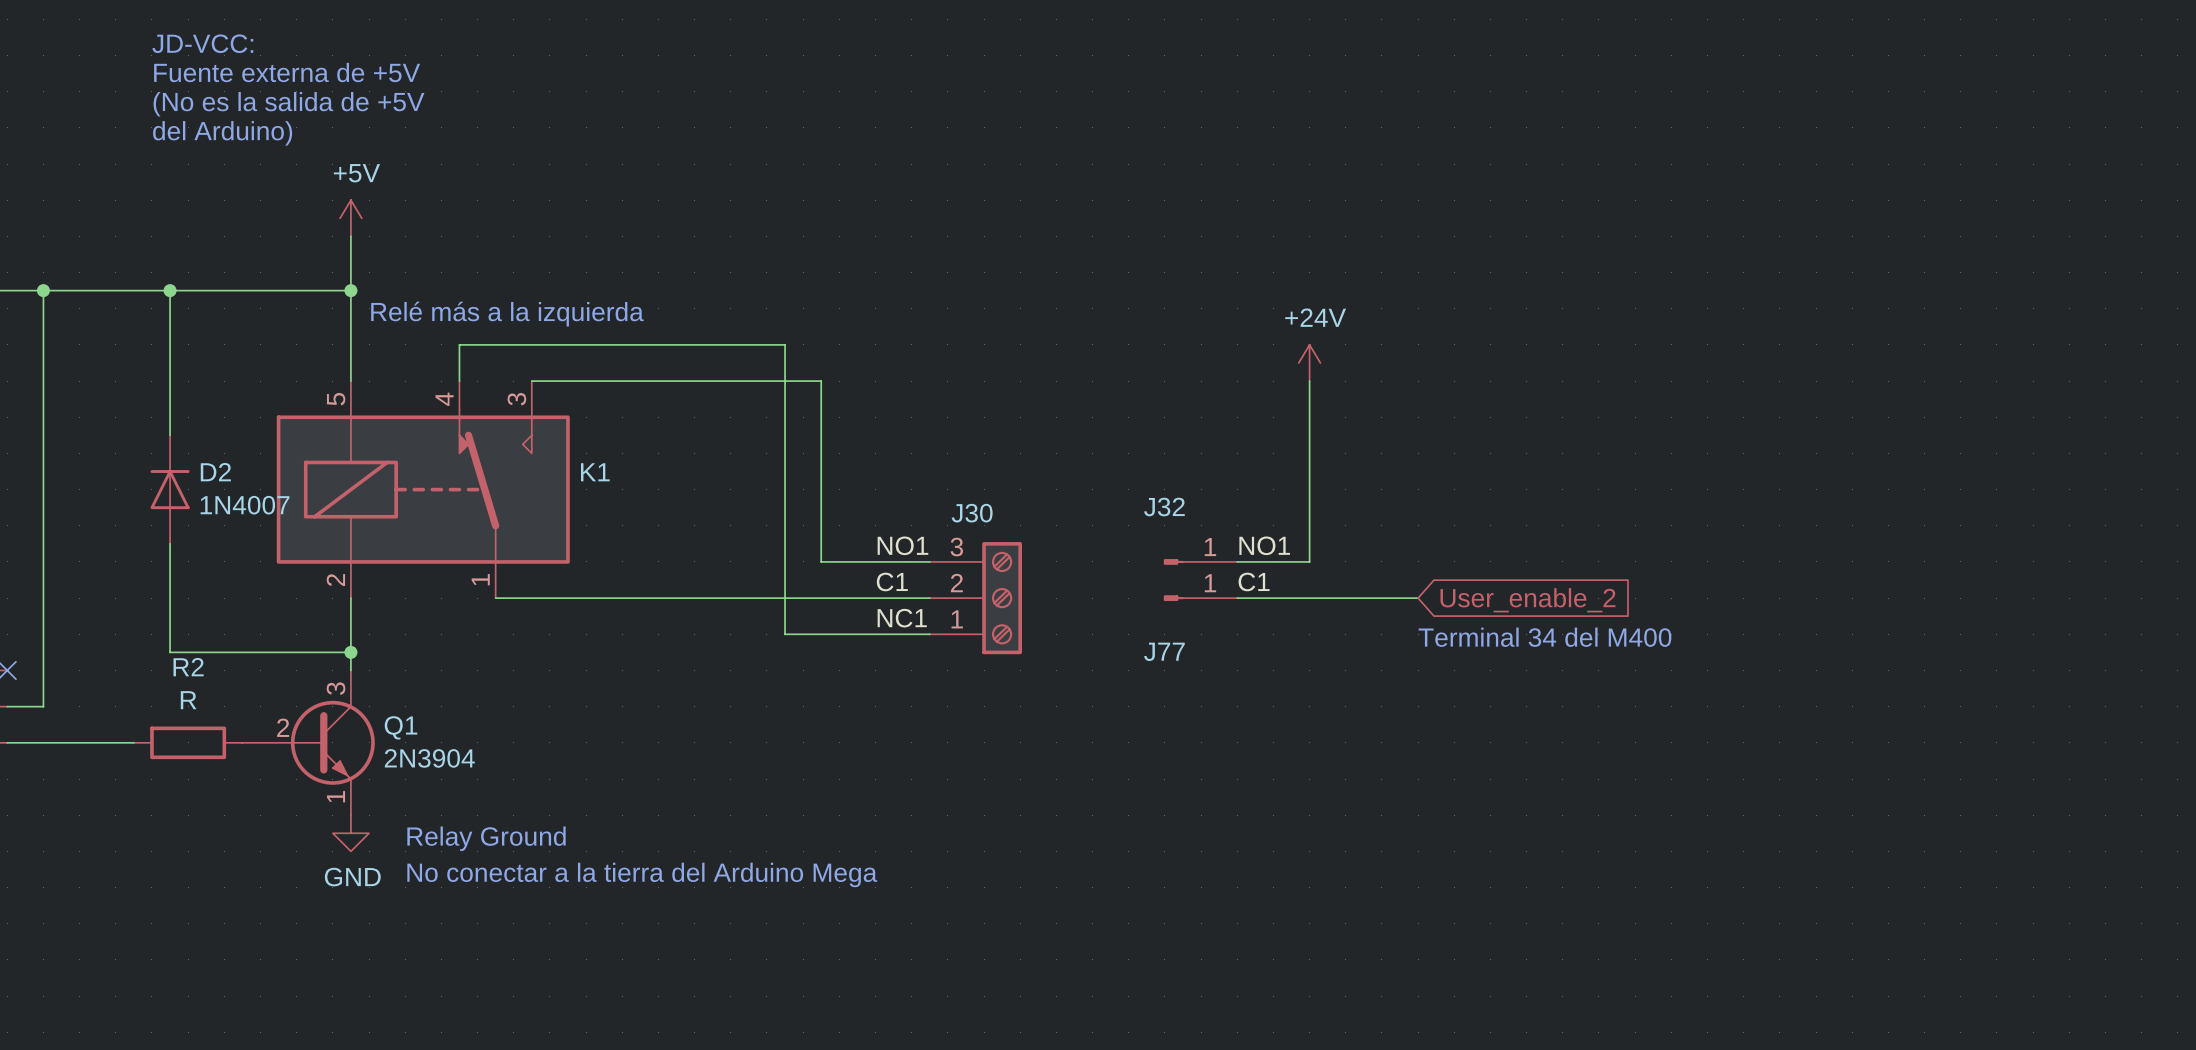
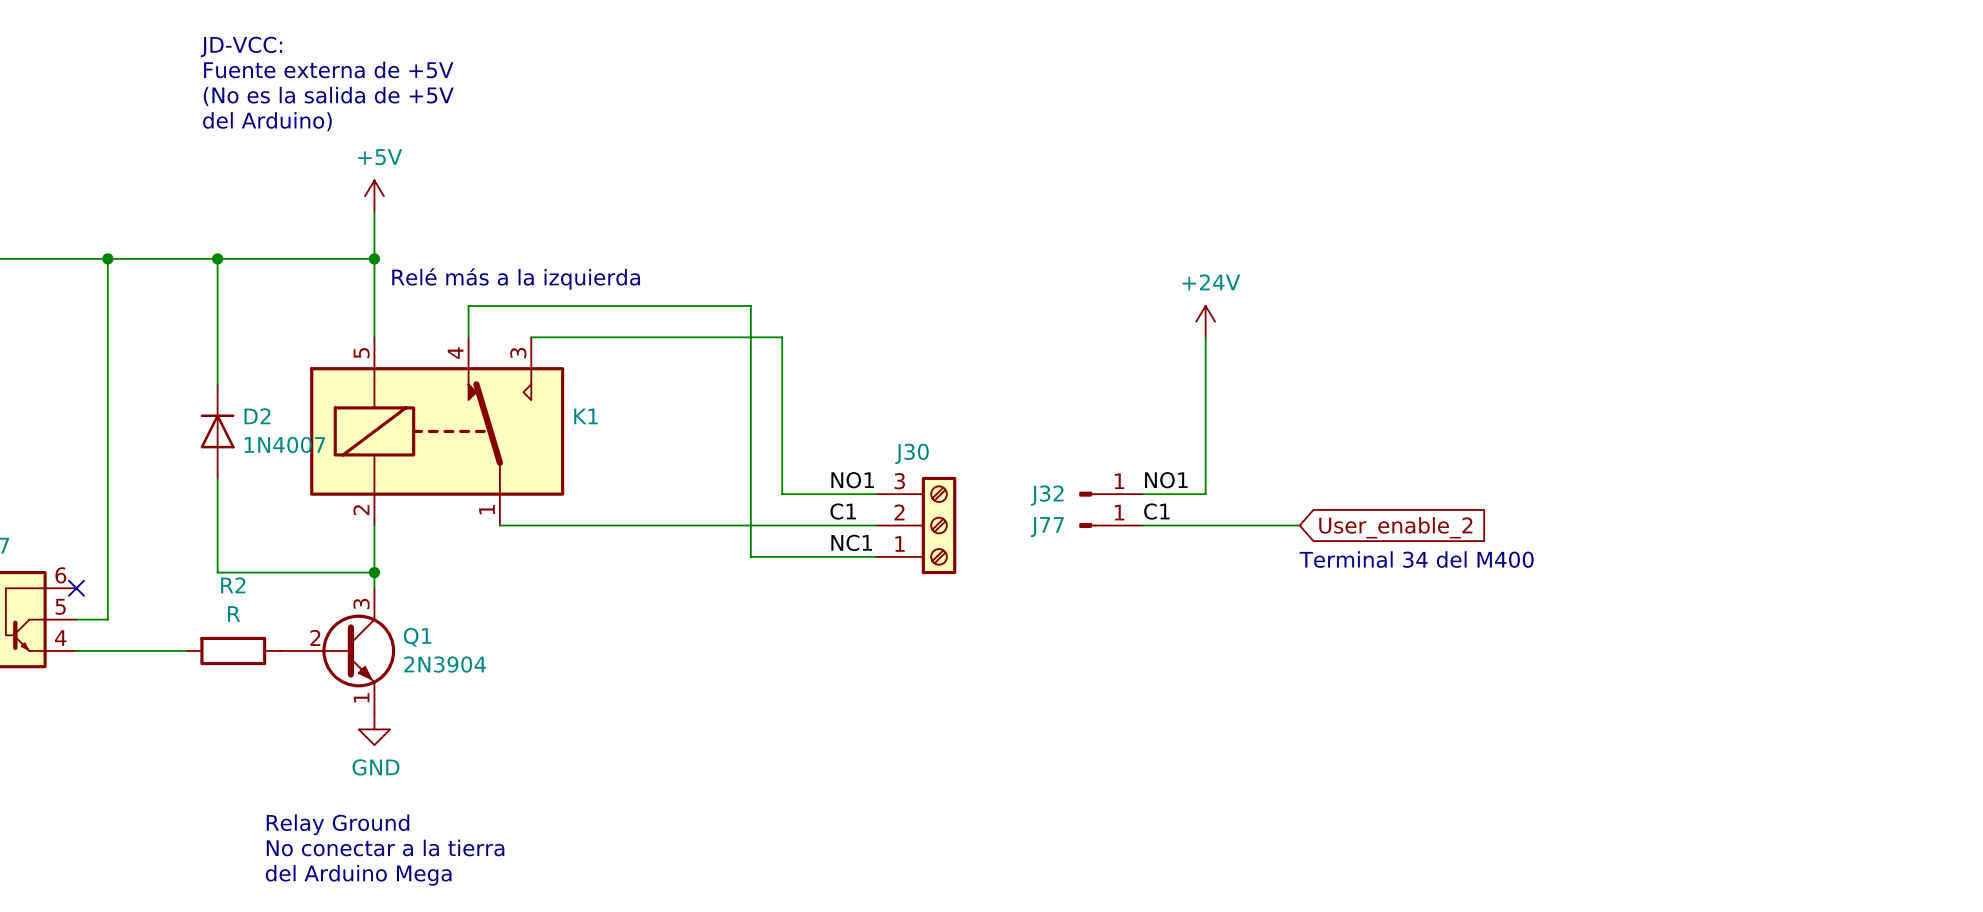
J32 name position: J32 (1164, 507) -> J32 (1047, 495)
J77 name position: J77 (1164, 651) -> J77 (1047, 527)
text position: Relay Ground (486, 838) -> Relay Ground (338, 824)
text: No conectar a la tierra del Arduino Mega (642, 874) -> none
text: none -> No conectar a la tierra (385, 847)
text: none -> del Arduino Mega (358, 875)

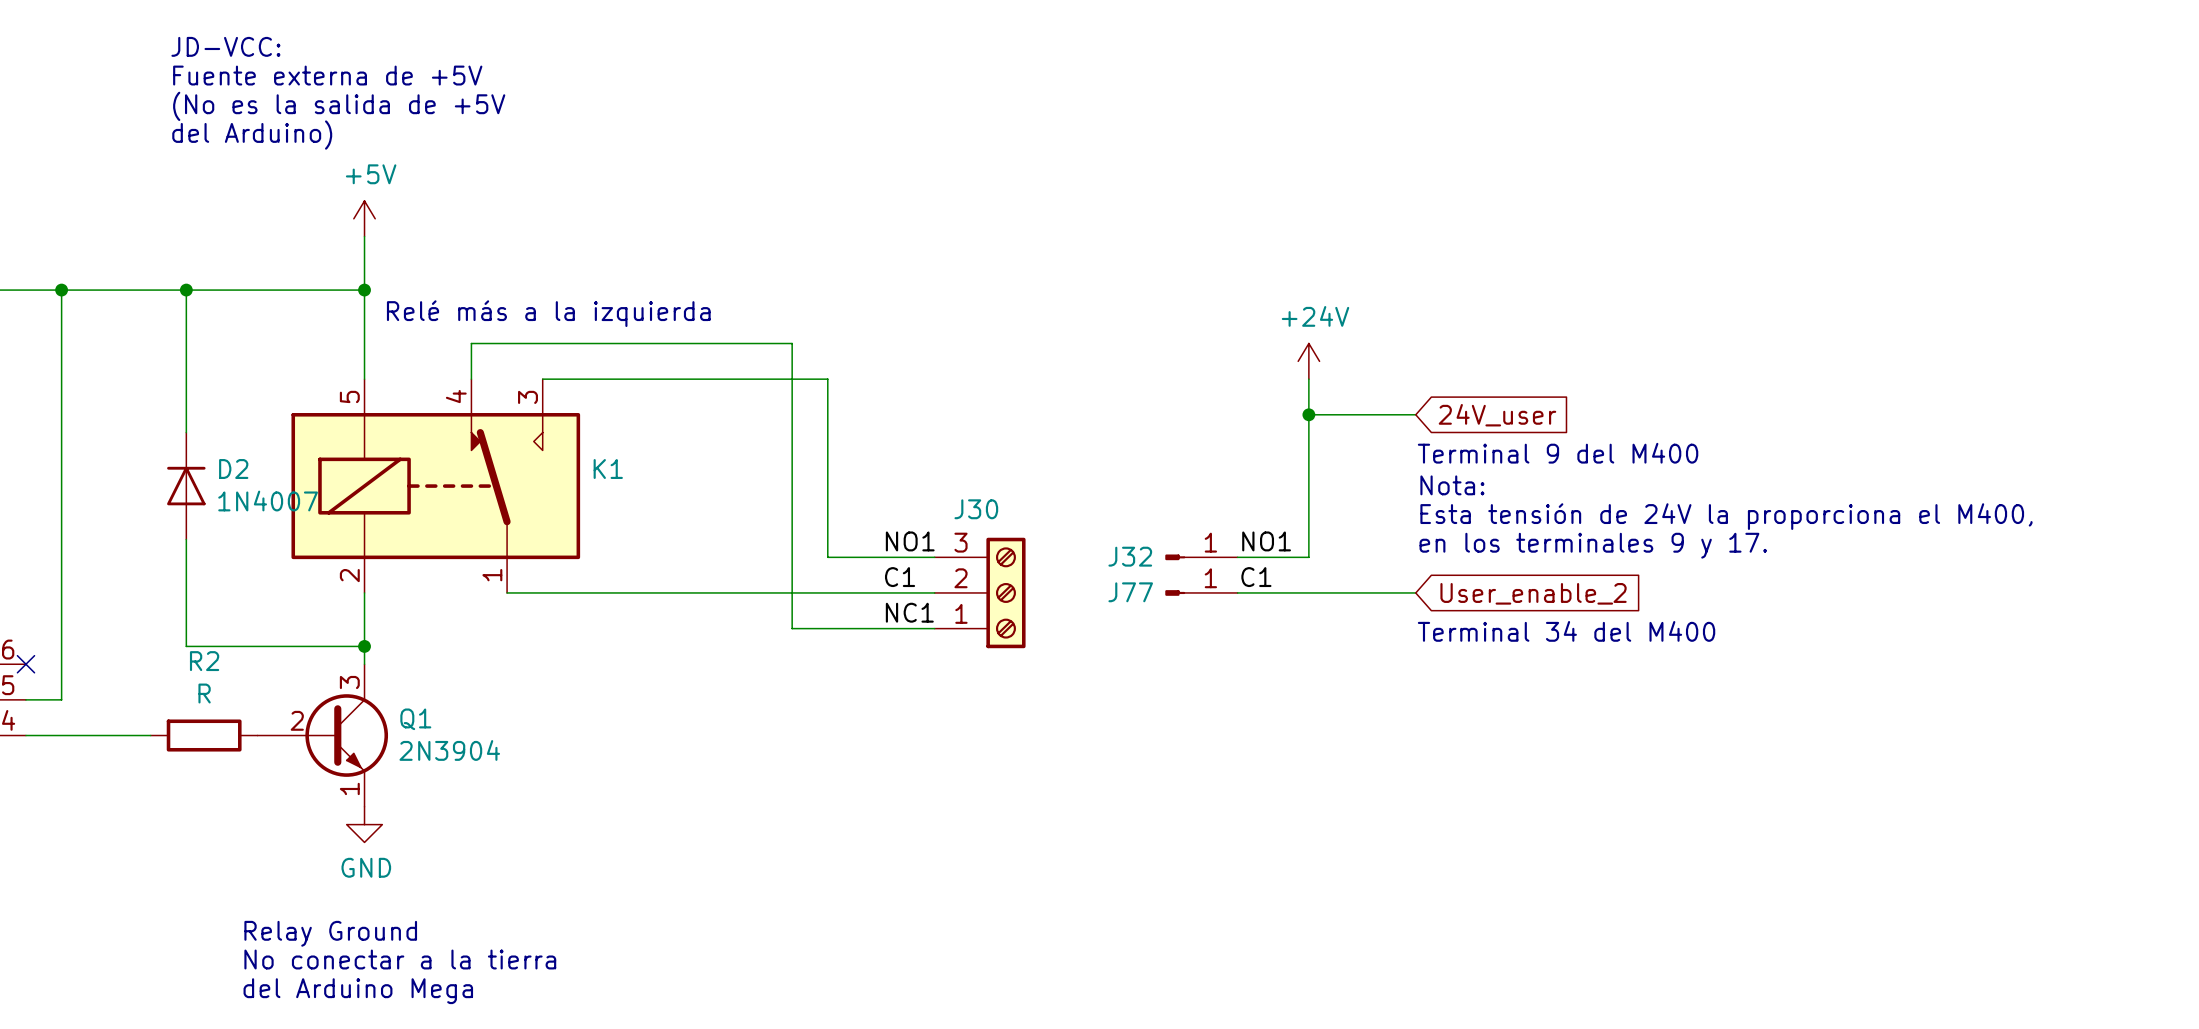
wire: none -> (1308, 414) (1415, 414)
junction: none -> (1308, 414)
global label: none -> 24V_user (1497, 415)
text: none -> Terminal 9 del M400 (1558, 453)
text: none -> Nota: (1452, 485)
text: none -> Esta tensión de 24V la proporciona el M400, (1726, 516)
text: none -> en los terminales 9 y 17. (1593, 545)

